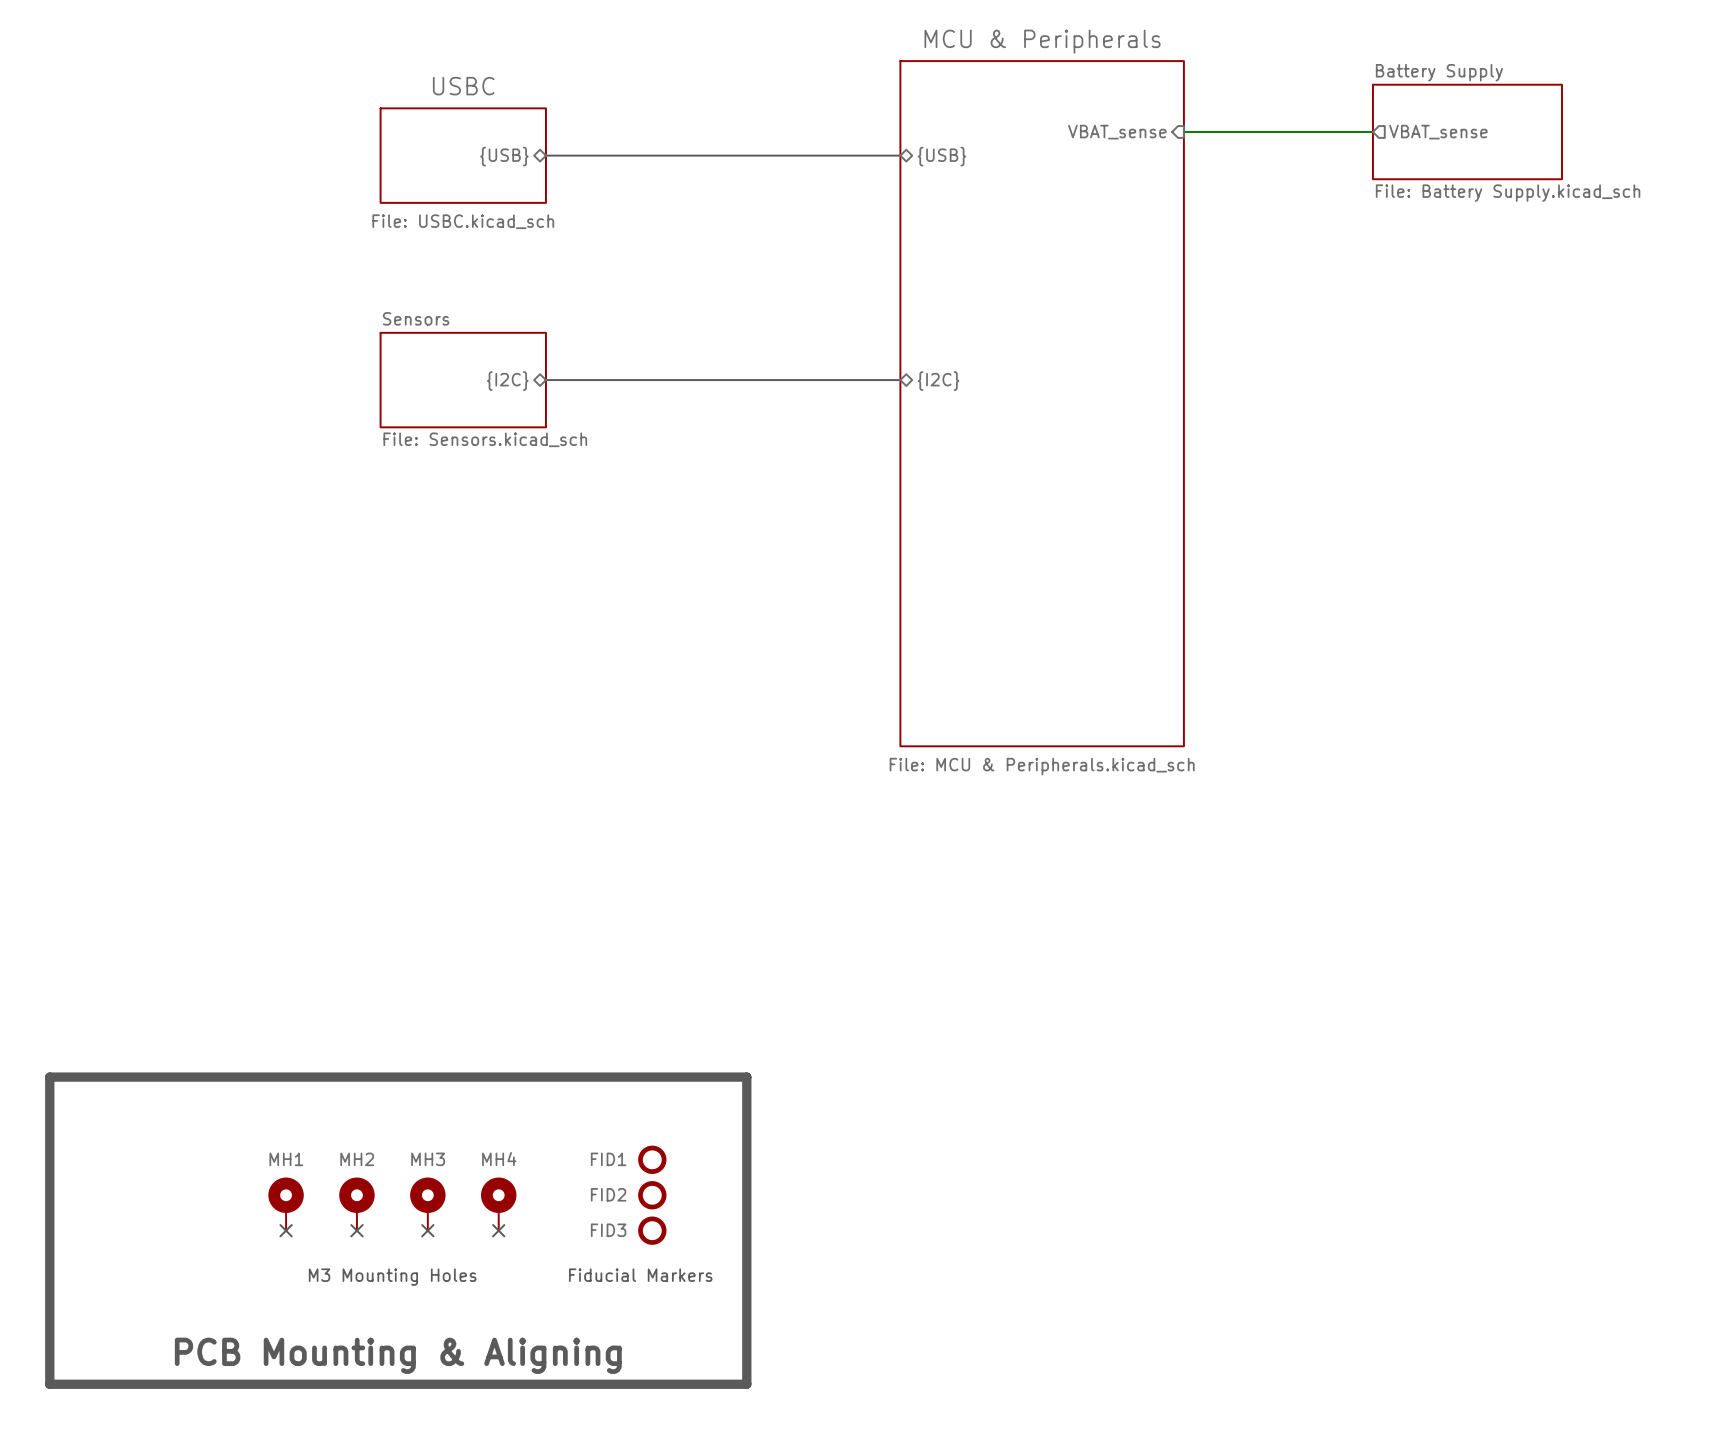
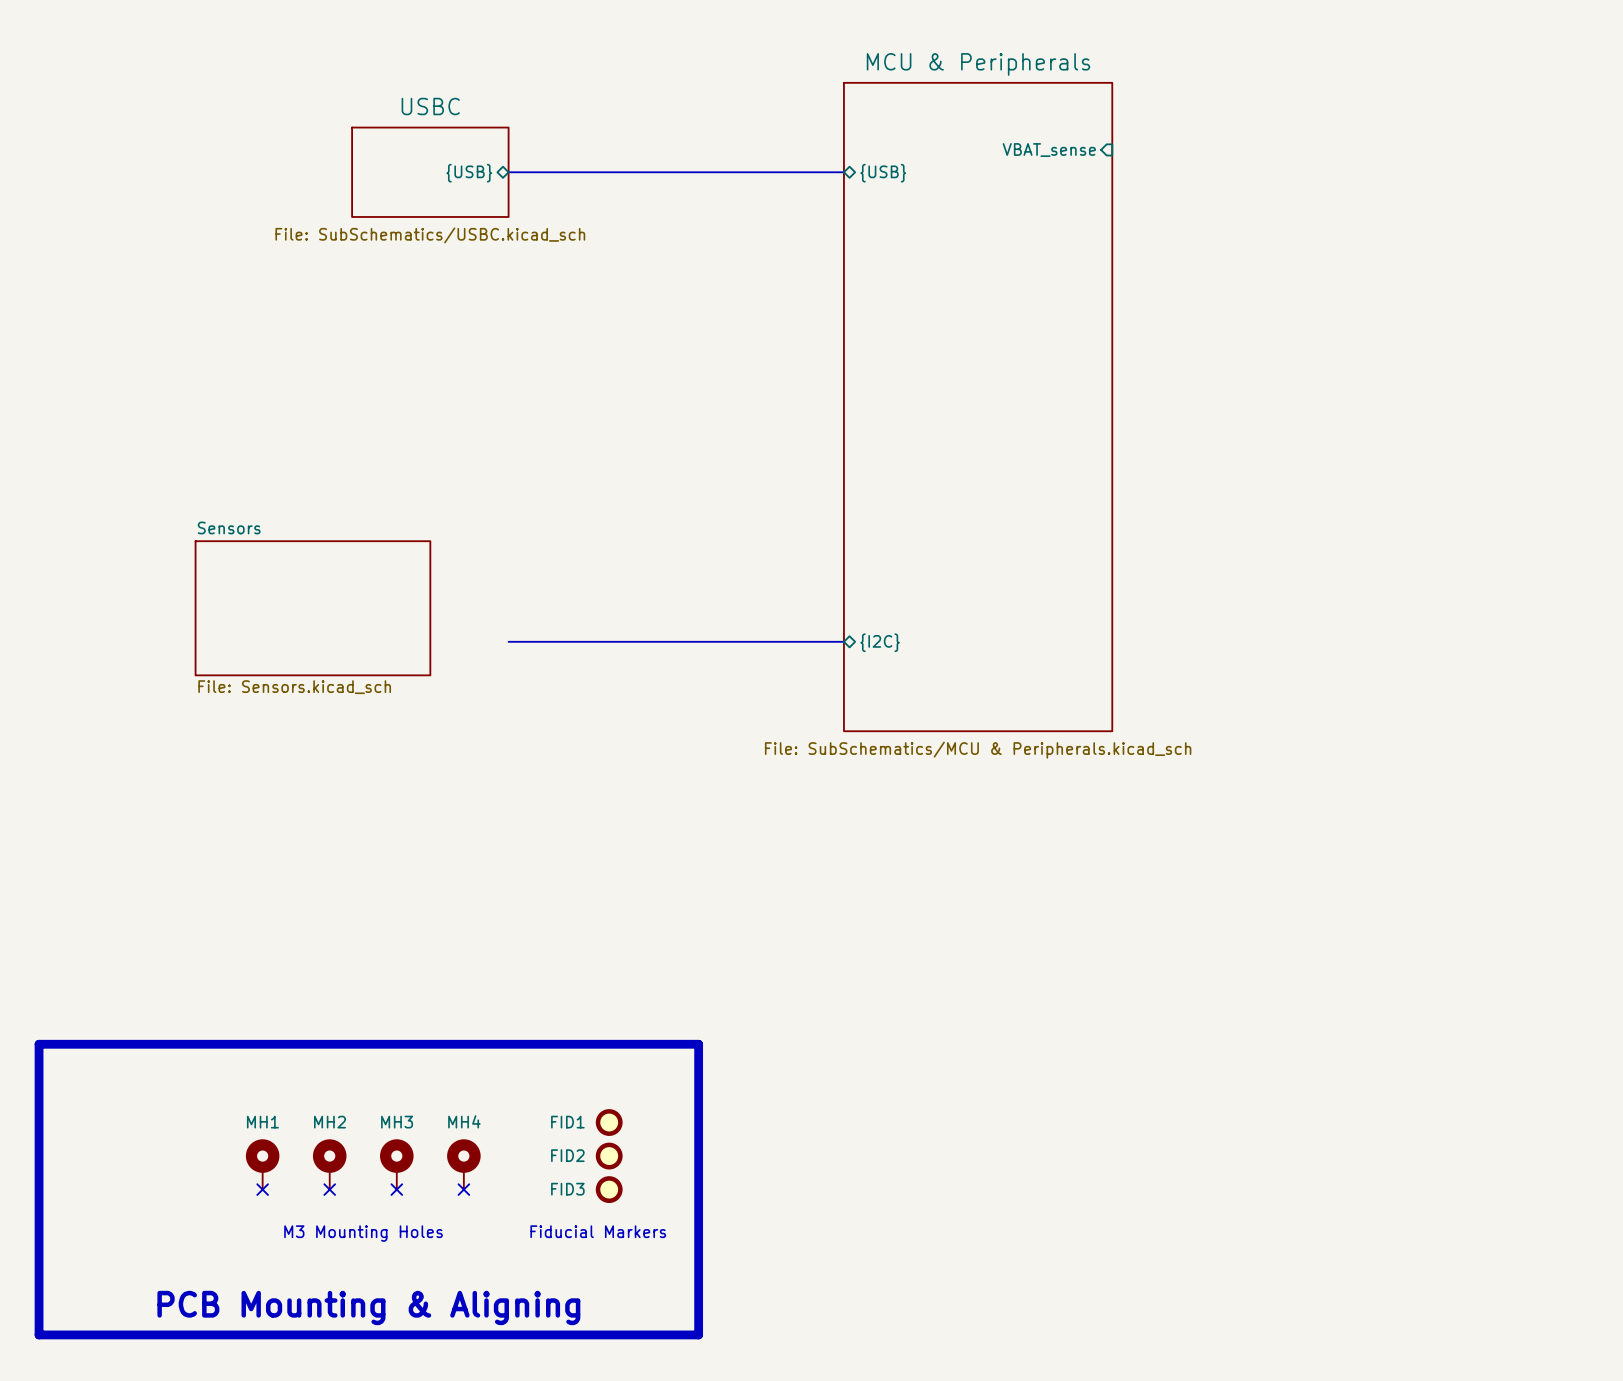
wire: (1183, 131) (1372, 131) -> none
sheet Battery Supply: File: Battery Supply.kicad_sch (1467, 131) -> none
sheet pin: VBAT_sense (1438, 132) -> none
sheet USBC value: File: USBC.kicad_sch (463, 221) -> File: SubSchematics/USBC.kicad_sch (430, 235)
sheet Sensors: File: Sensors.kicad_sch (463, 380) -> none
bus: (545, 380) (900, 380) -> none
sheet pin: {I2C} (507, 381) -> none
sheet pin: {I2C} (938, 381) -> none
sheet Sensors: none -> File: Sensors.kicad_sch (312, 608)
bus: none -> (508, 641) (843, 641)
sheet pin: none -> {I2C} (880, 642)
sheet MCU & Peripherals value: File: MCU & Peripherals.kicad_sch (1042, 766) -> File: SubSchematics/MCU & Peripherals.kicad_sch (978, 750)

